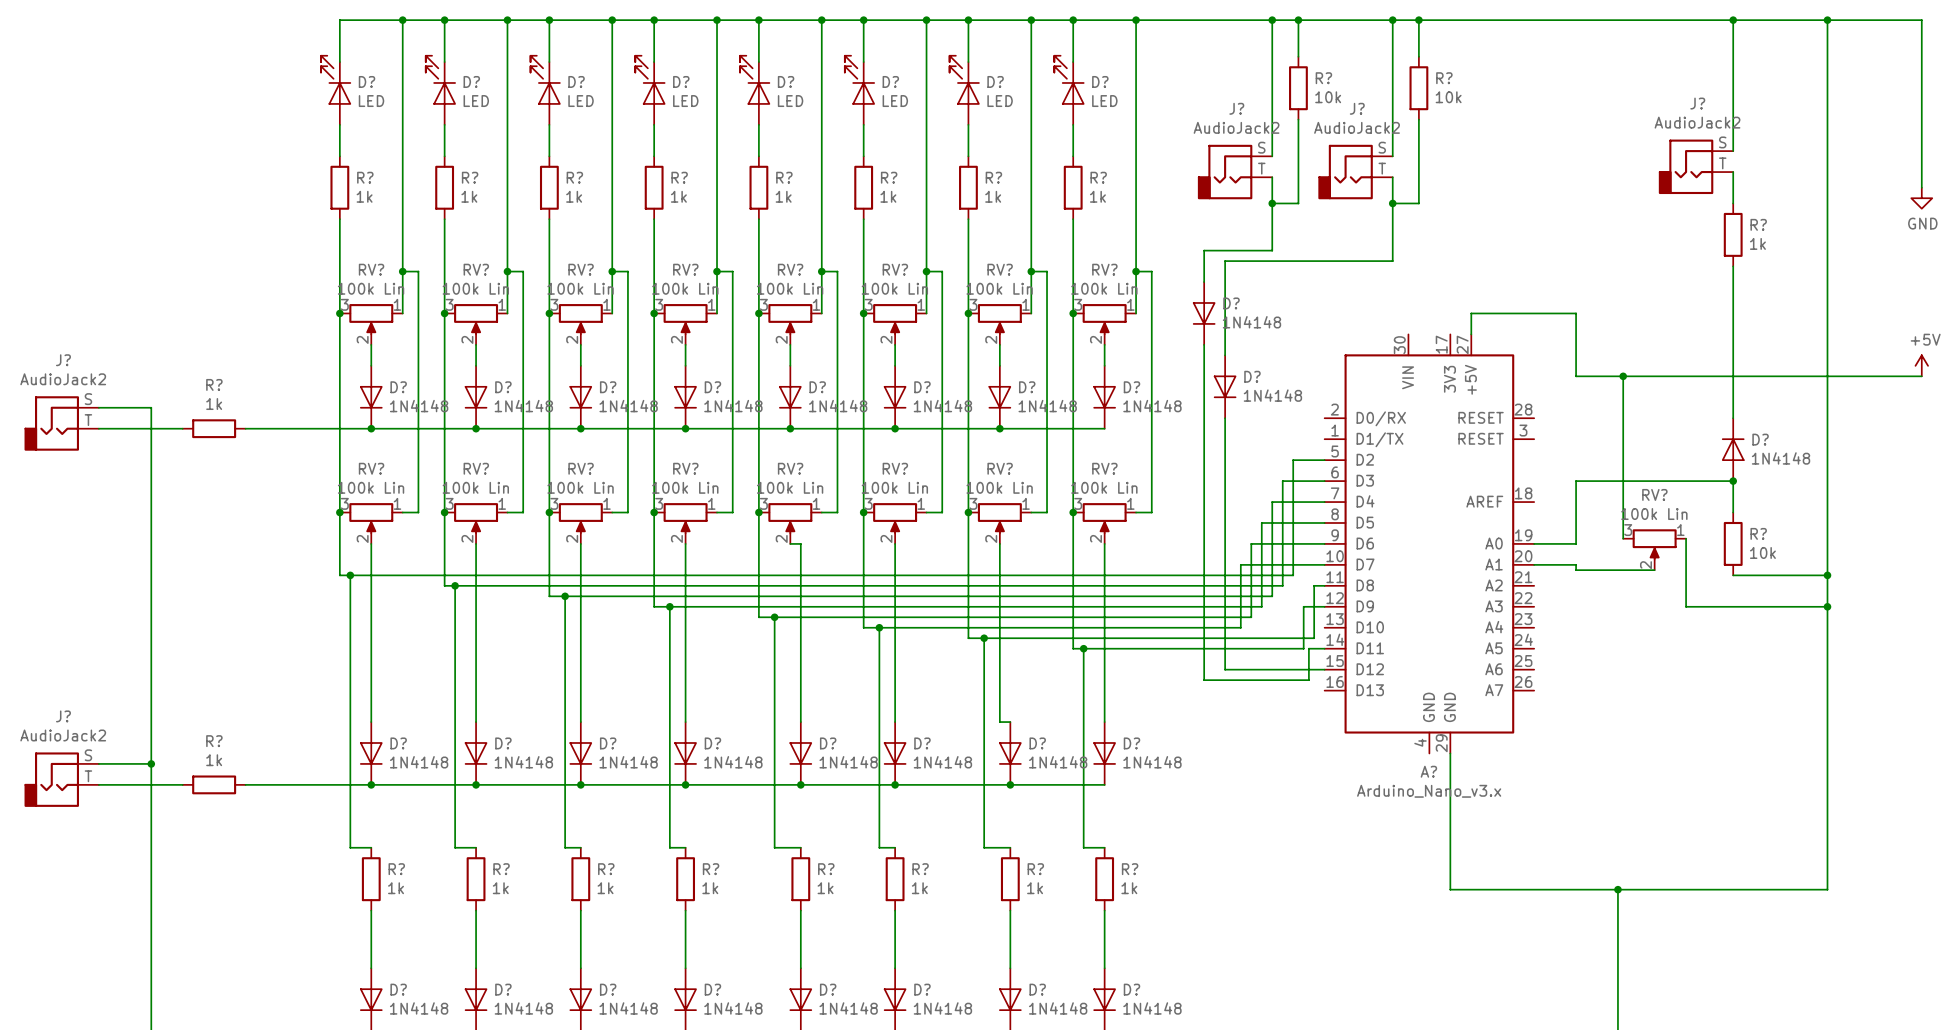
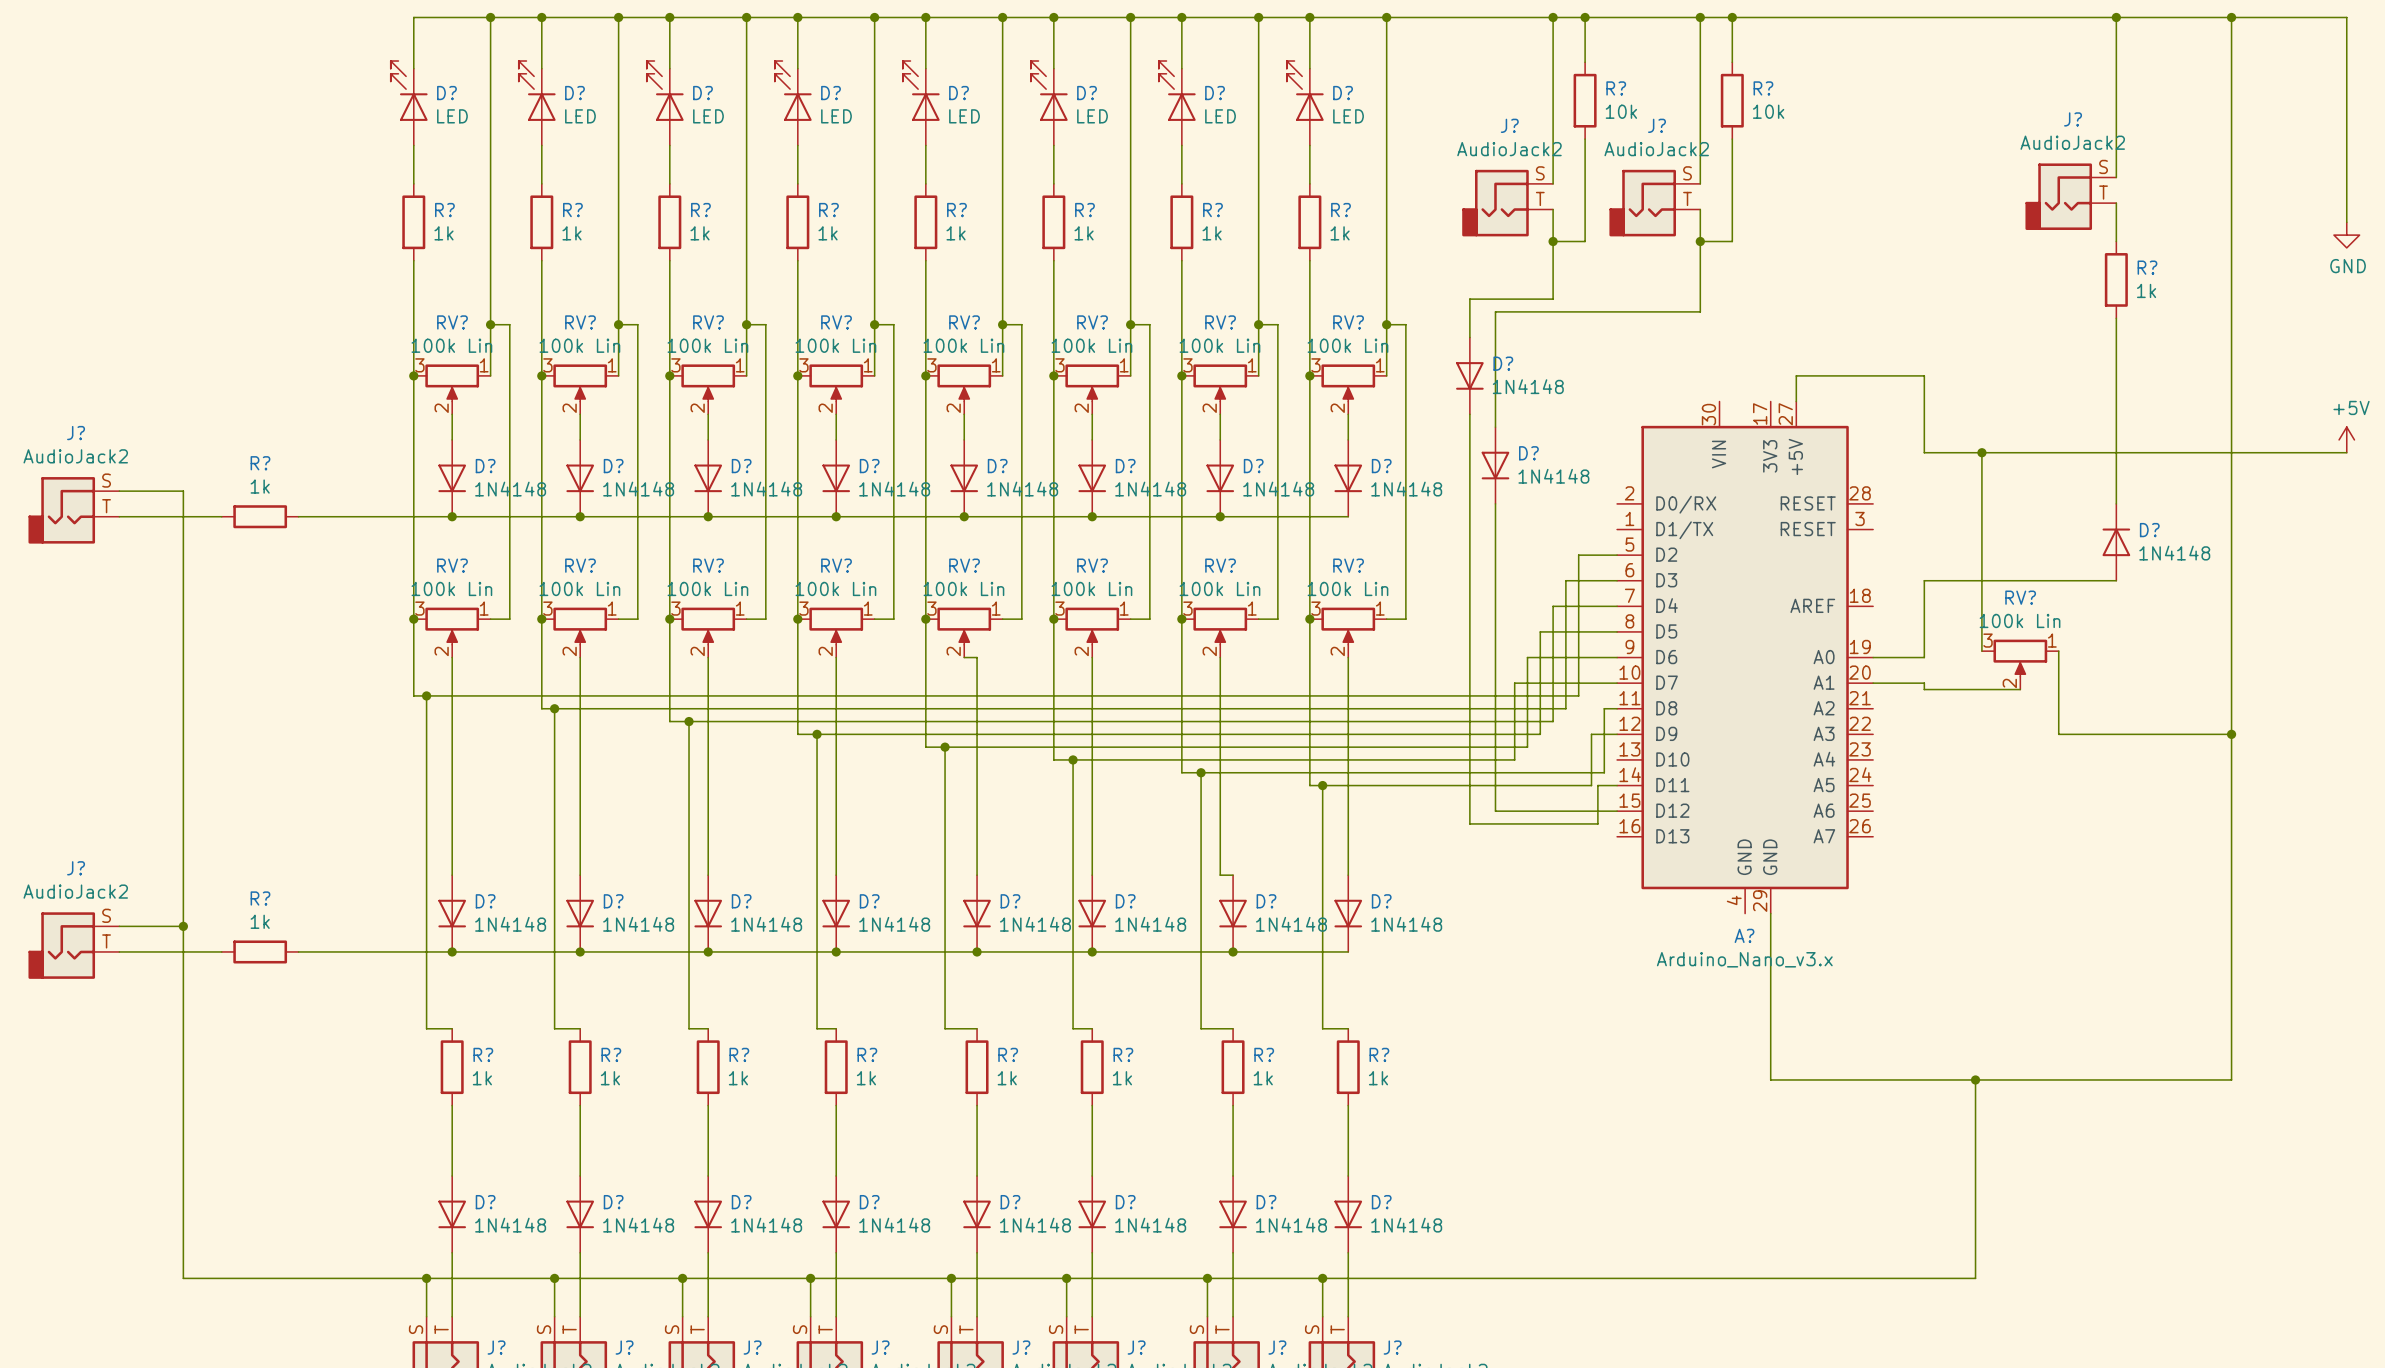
wire: (1733, 481) (1733, 512) -> none
junction: (1733, 481) -> none
R?: 10k (1733, 543) -> none
wire: (1733, 575) (1827, 575) -> none
junction: (1827, 575) -> none

